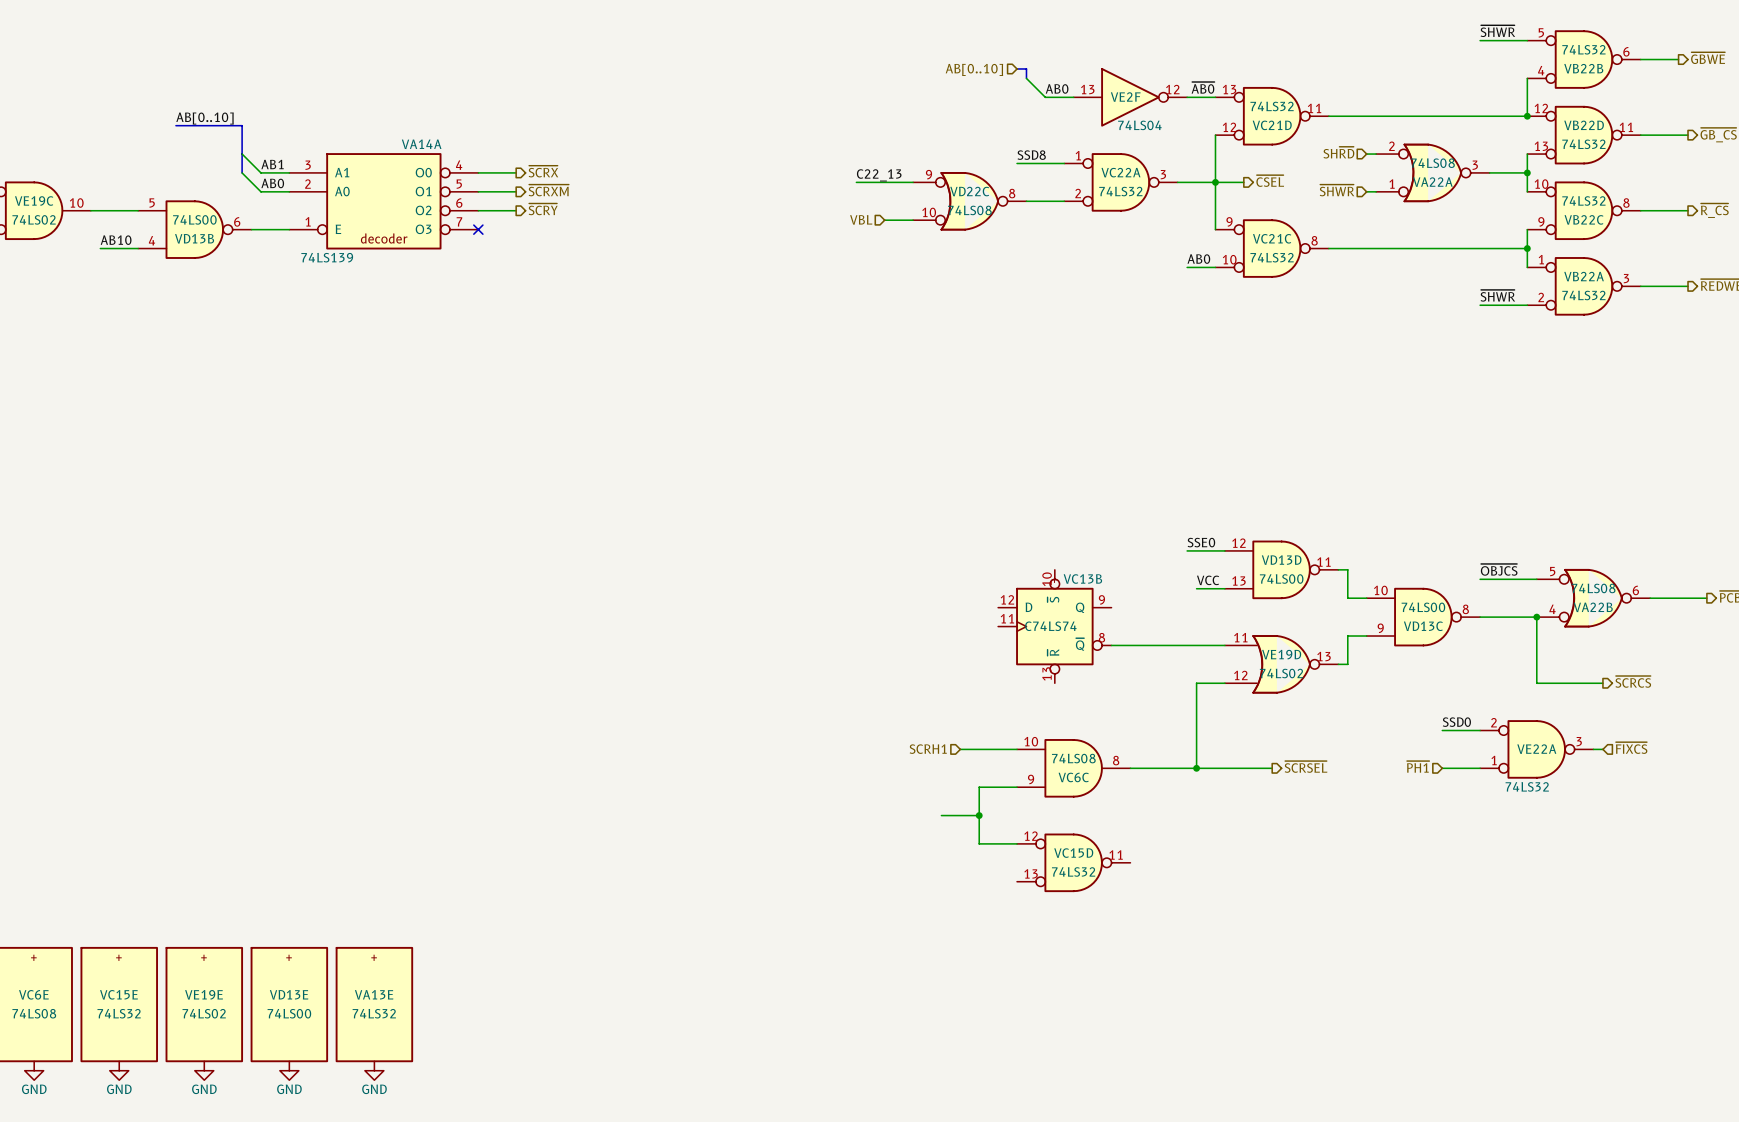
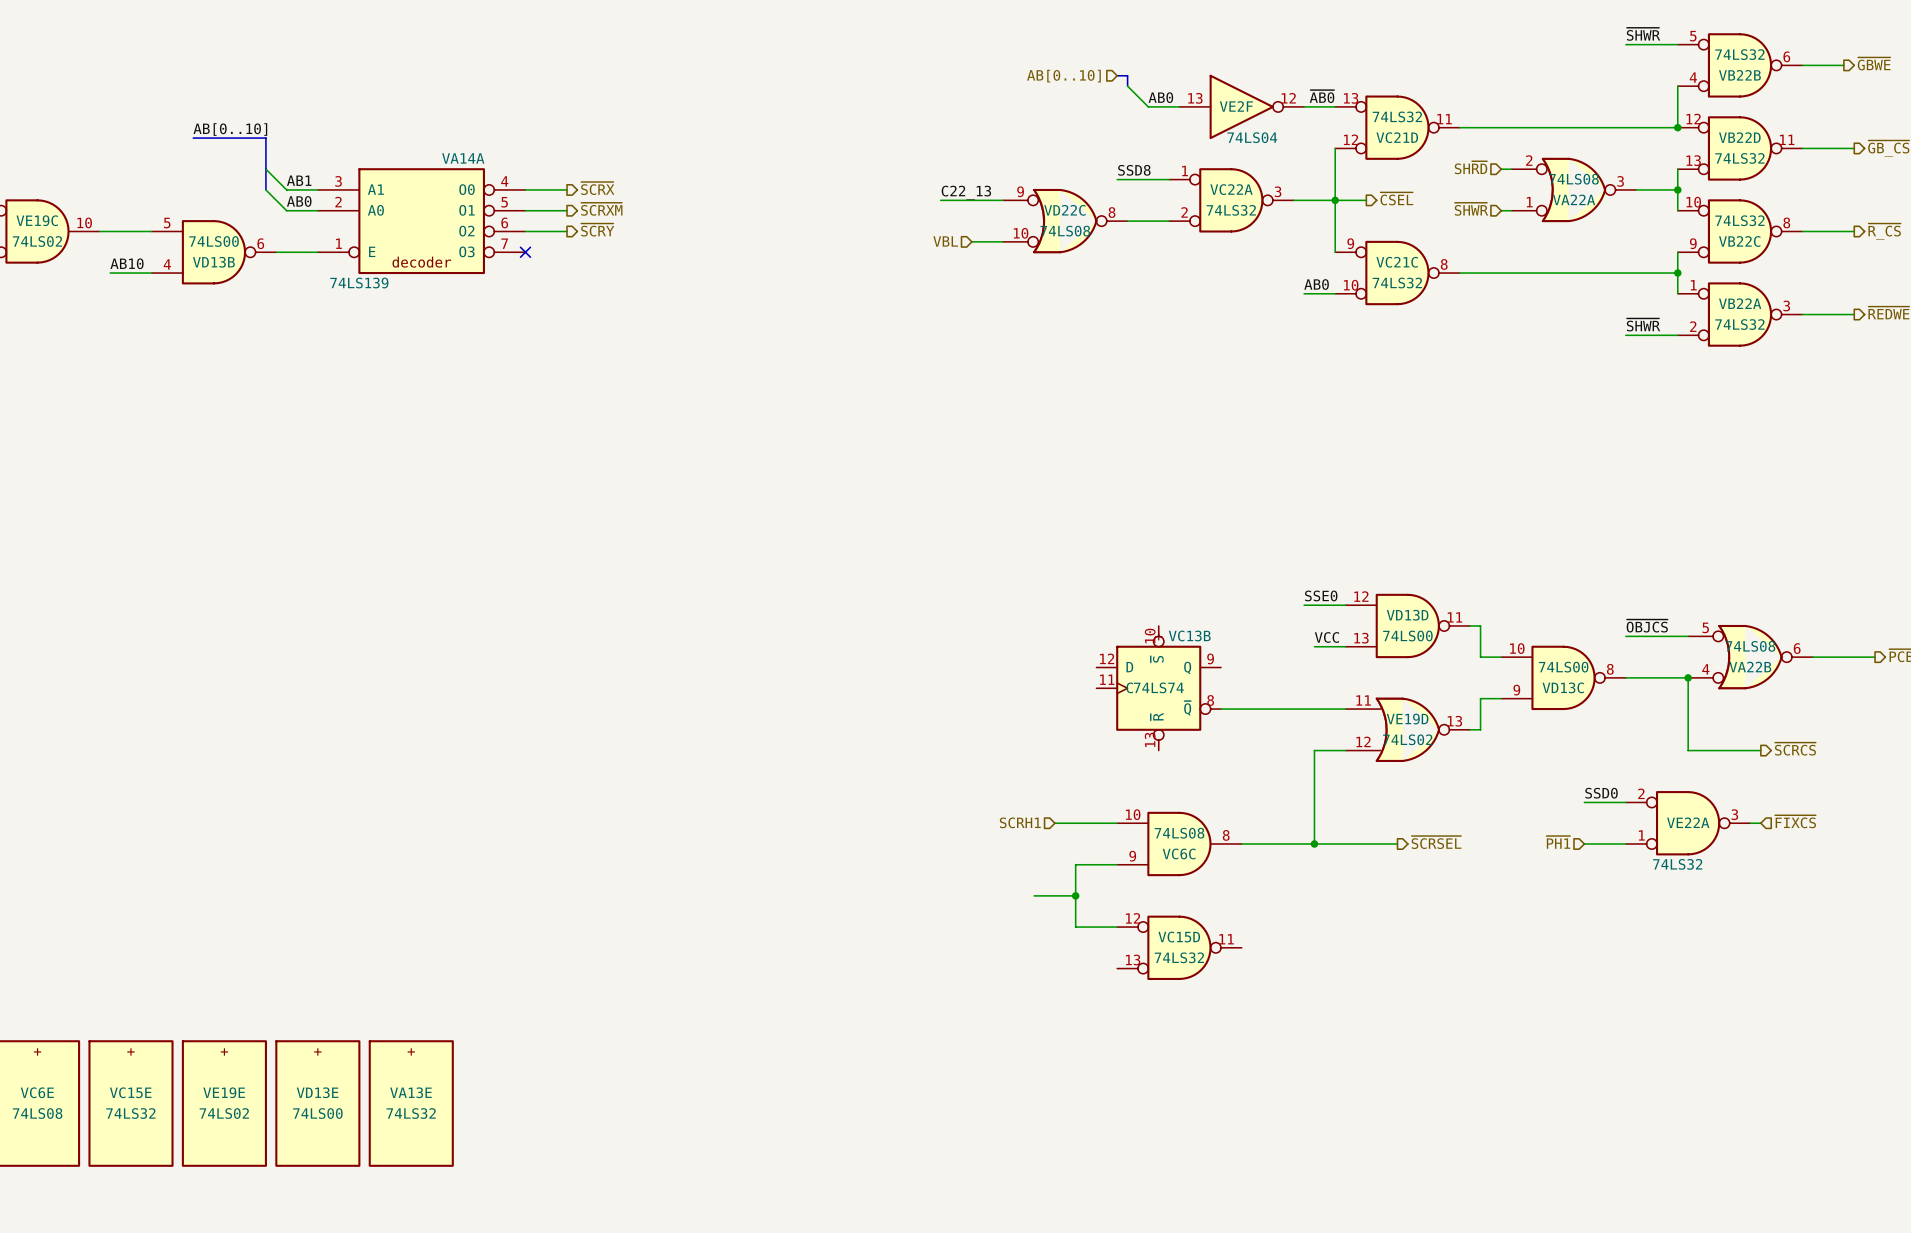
power symbol: GND (34, 1070) -> none
power symbol: GND (119, 1070) -> none
power symbol: GND (204, 1070) -> none
power symbol: GND (289, 1070) -> none
power symbol: GND (374, 1070) -> none

